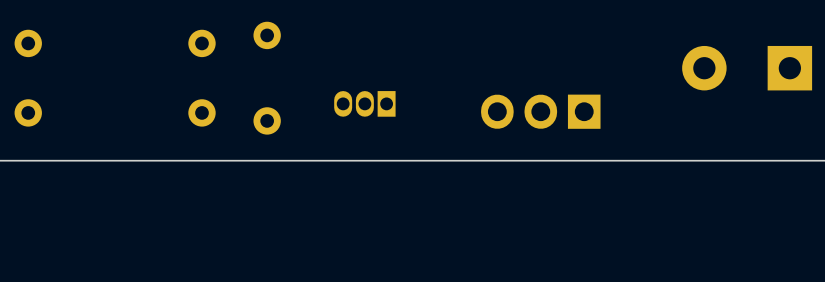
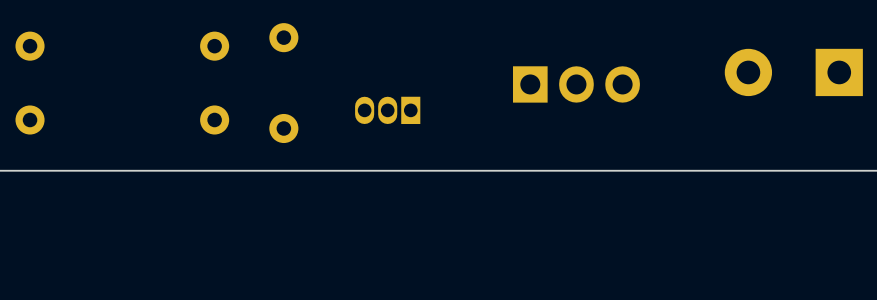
part rotation: 0° (540, 111) -> 180° (576, 84)

